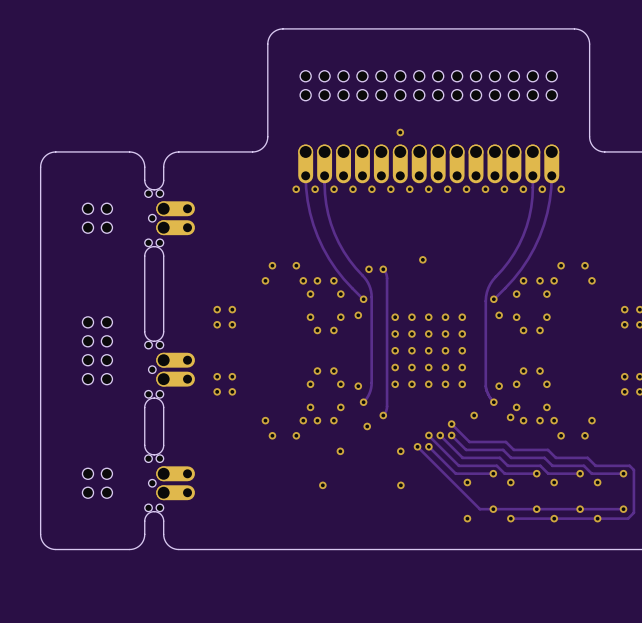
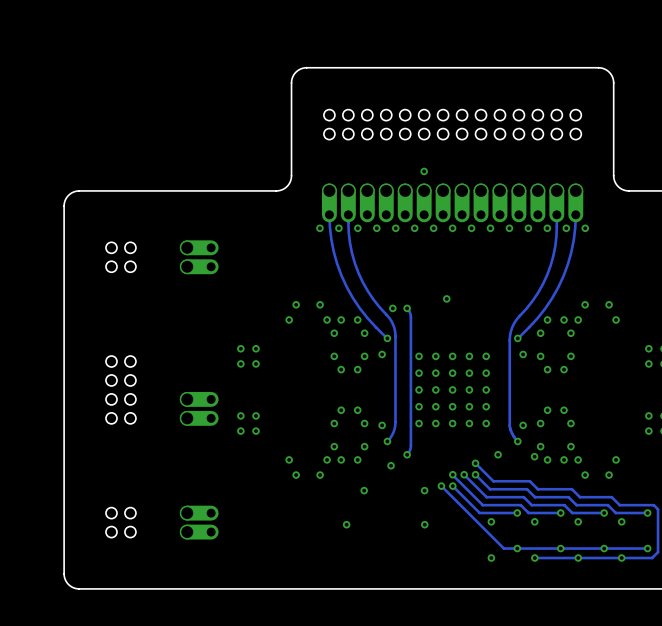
board edge: (178, 151) (171, 154) (165, 159) (163, 183) (160, 187) (154, 189) (149, 188) (145, 183) (142, 159) (137, 154) (129, 151) -> (202, 190) (153, 190)
part: (154, 218) -> none
board edge: (154, 246) (147, 249) (144, 256) (144, 332) (148, 339) (154, 341) (160, 338) (163, 331) (163, 255) (160, 248) (154, 246) -> none
part: (154, 369) -> none
board edge: (154, 398) (147, 400) (144, 407) (144, 447) (148, 452) (154, 454) (160, 452) (163, 445) (163, 405) (160, 400) (154, 398) -> none
part: (154, 483) -> none
board edge: (178, 549) (171, 547) (165, 541) (163, 517) (159, 513) (154, 511) (148, 513) (145, 517) (142, 541) (137, 547) (129, 549) -> (202, 588) (153, 588)

